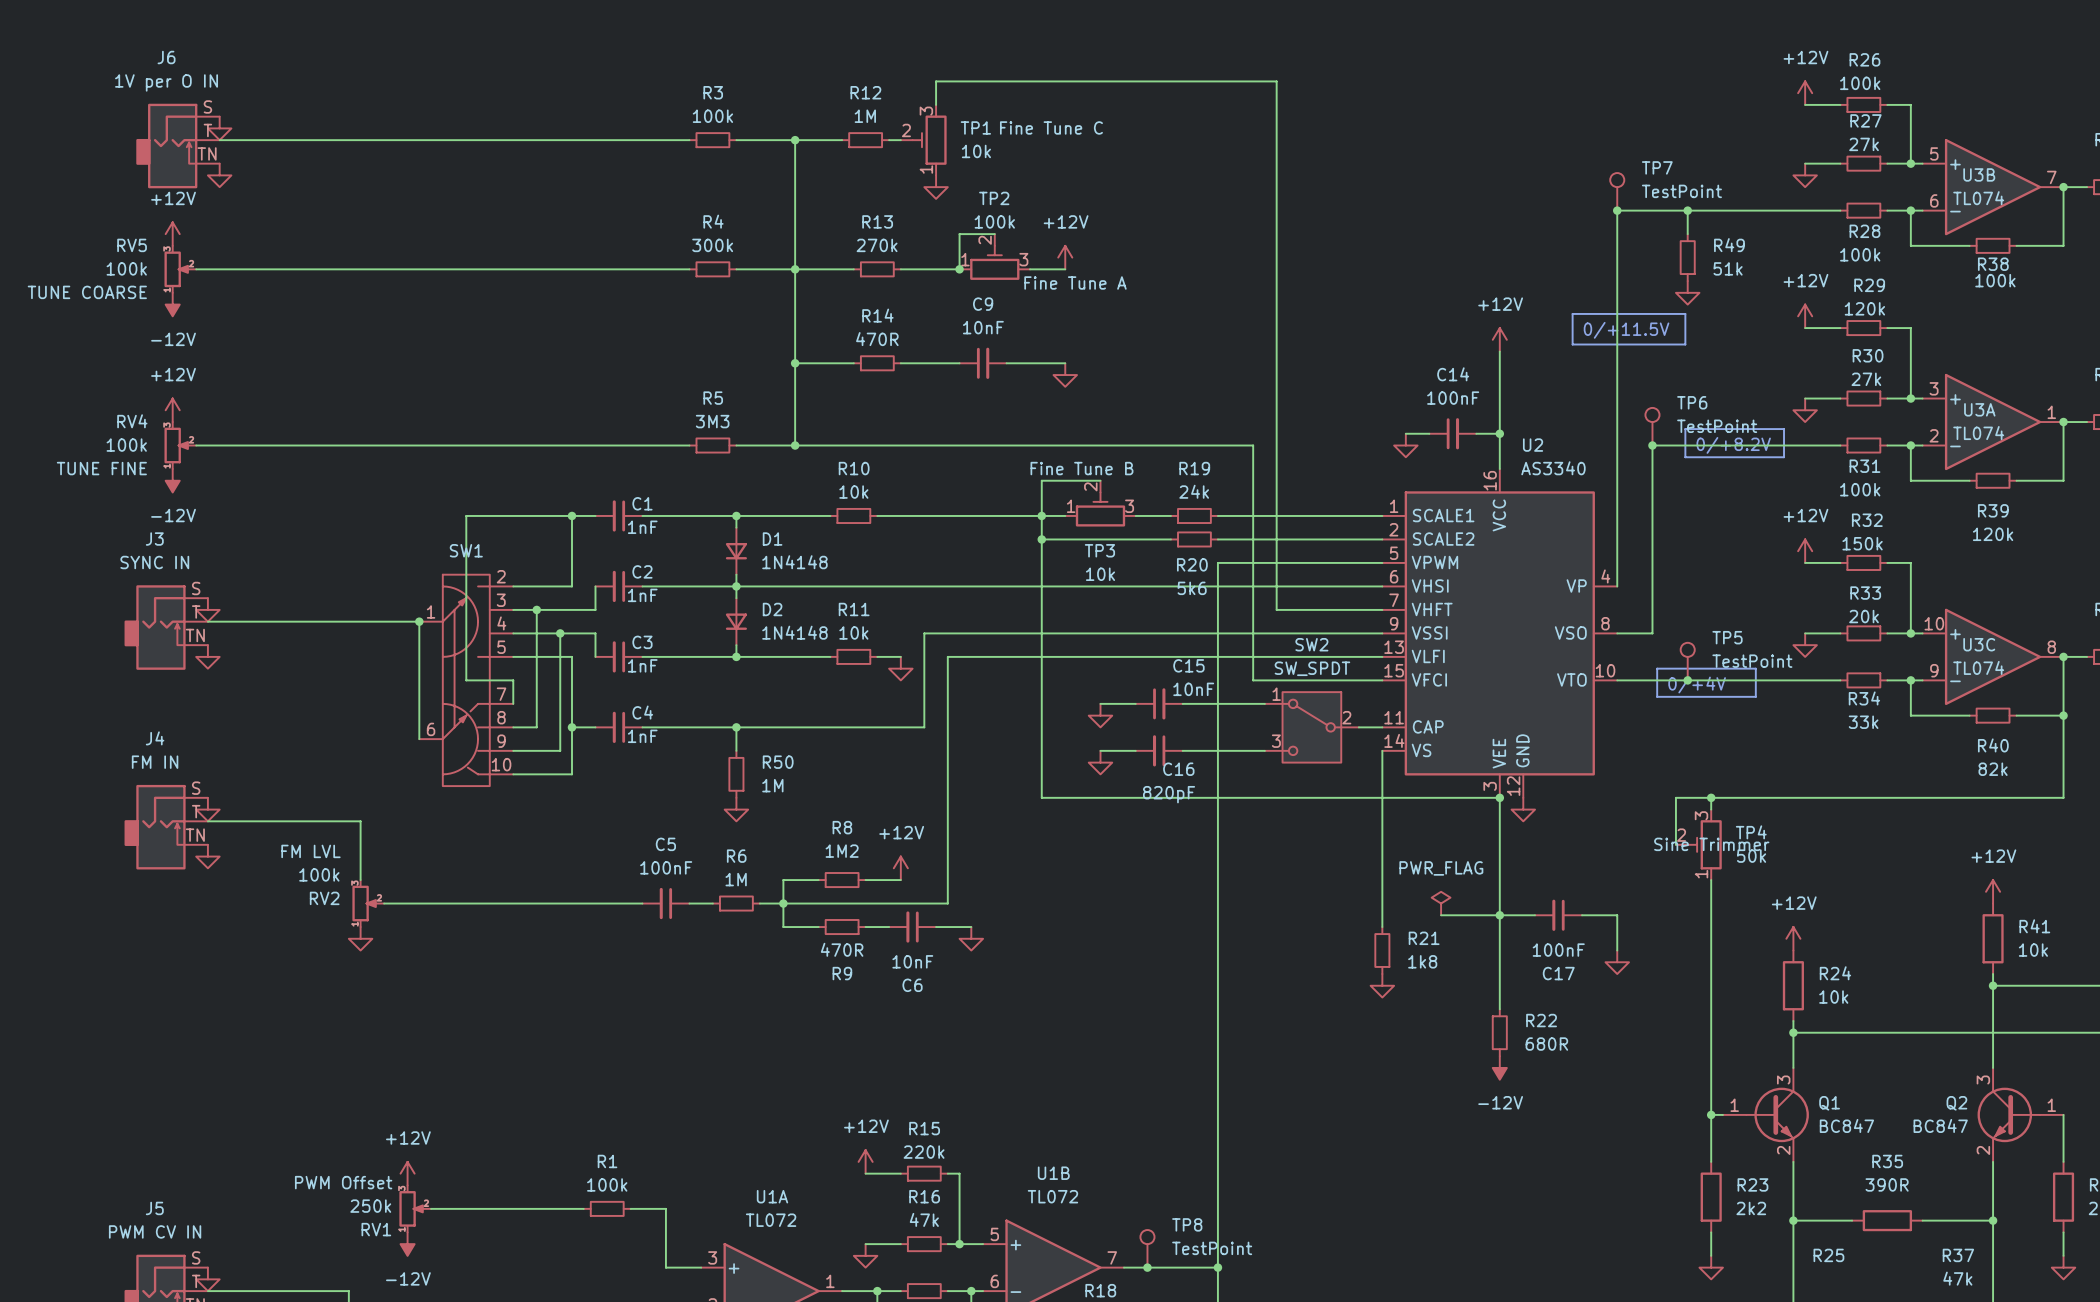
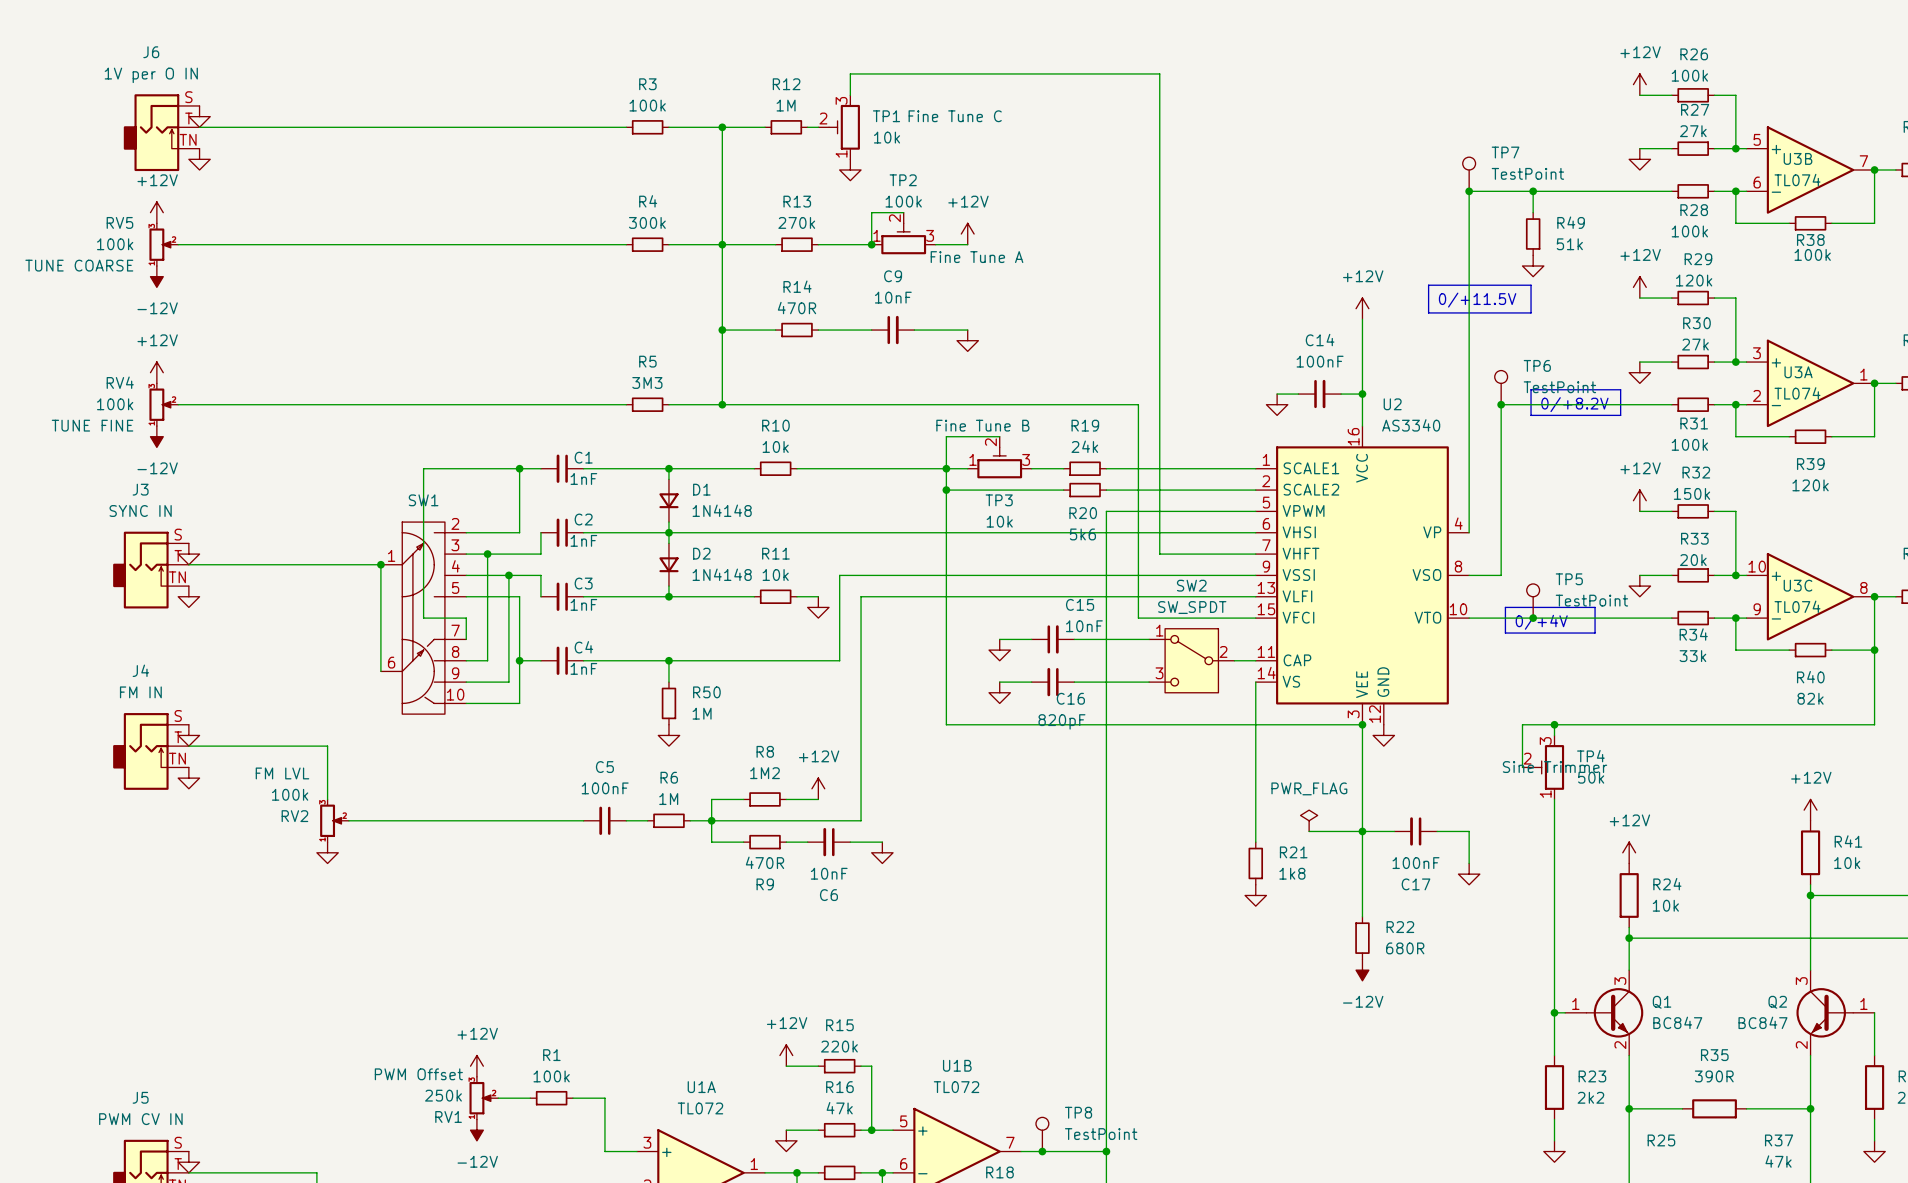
power symbol position: +12V (407, 1173) -> +12V (476, 1066)
RV1 position: (415, 1208) -> (483, 1098)
wire: (431, 1208) (548, 1208) -> none
power symbol position: -12V (407, 1244) -> -12V (476, 1130)

